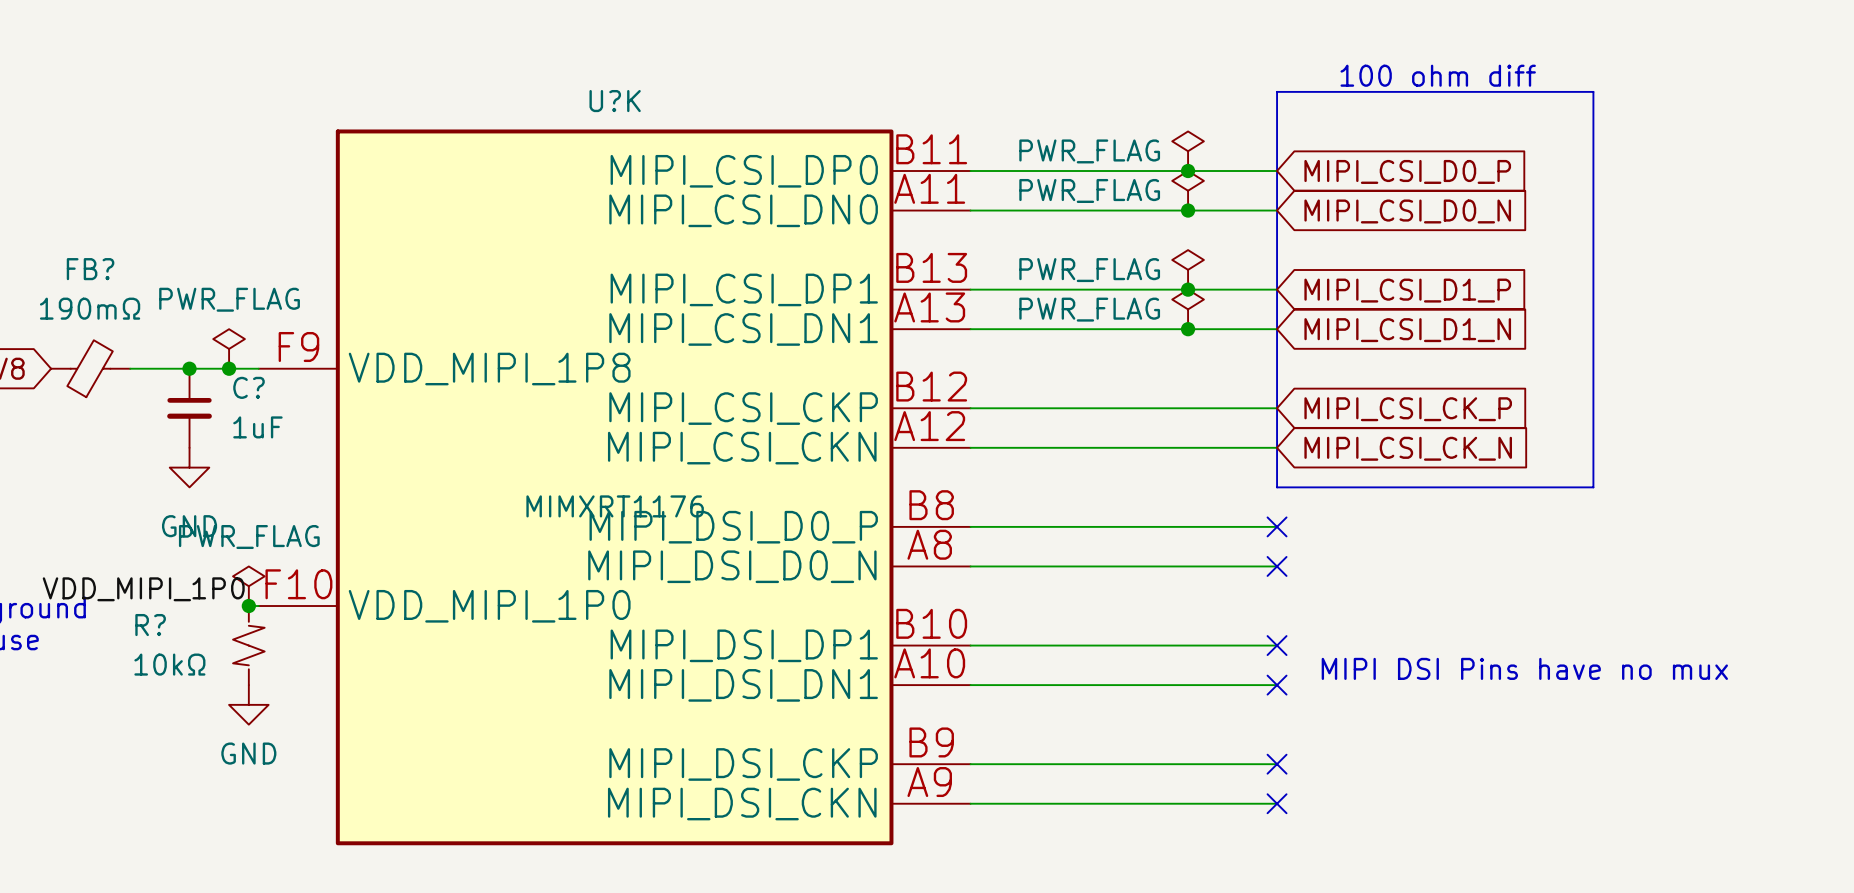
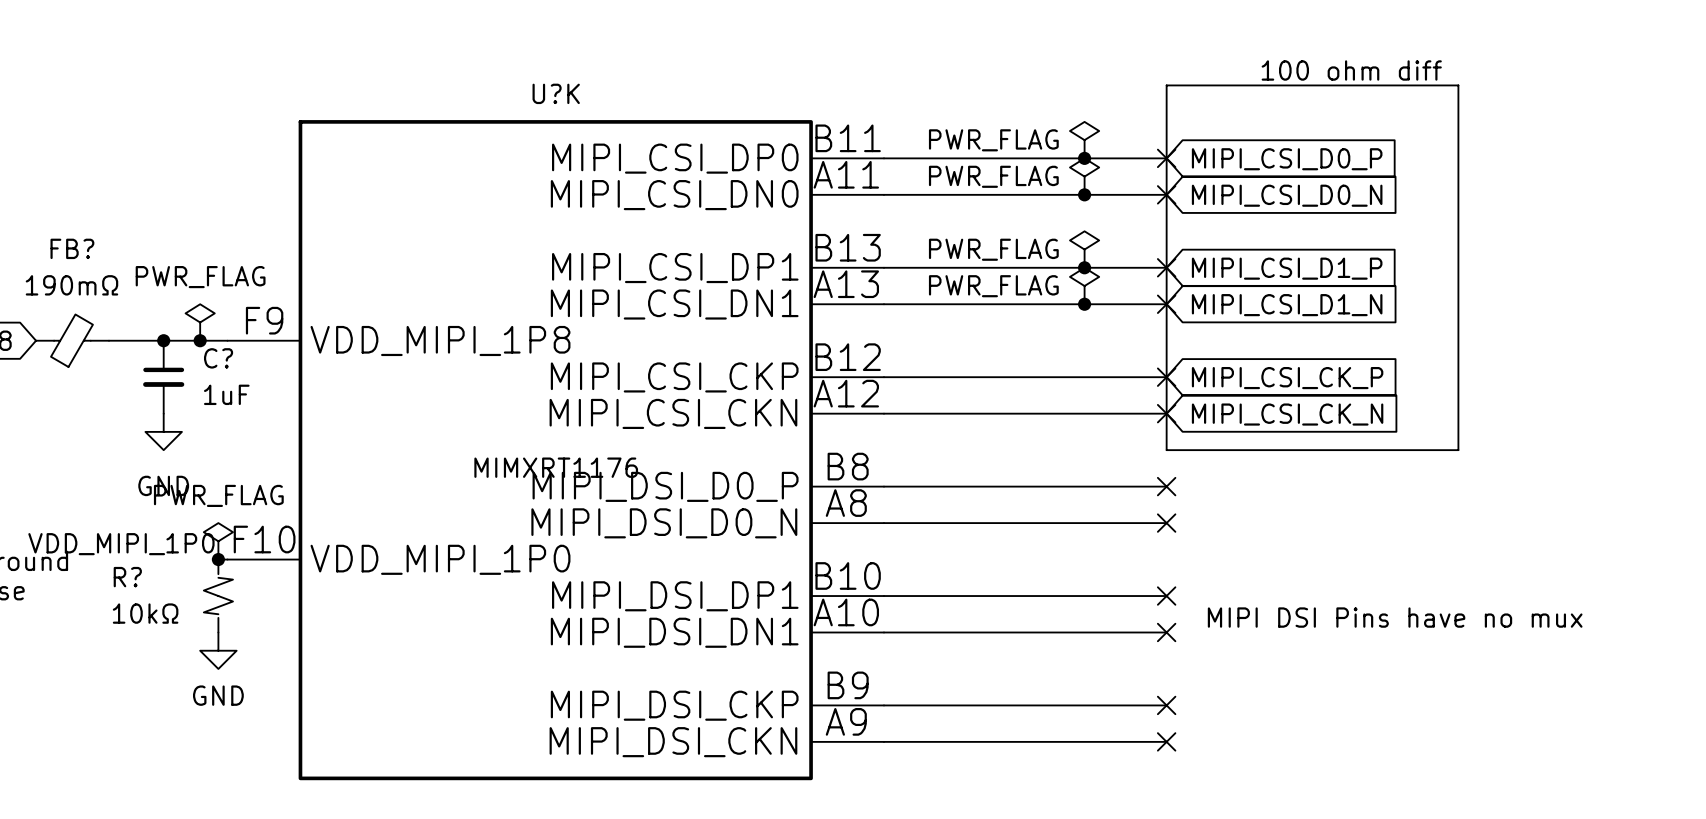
text position: 100 ohm diff (1438, 75) -> 100 ohm diff (1351, 70)
no-connect mark: none -> (1166, 158)
no-connect mark: none -> (1166, 194)
no-connect mark: none -> (1166, 267)
no-connect mark: none -> (1166, 304)
no-connect mark: none -> (1166, 377)
no-connect mark: none -> (1166, 413)

